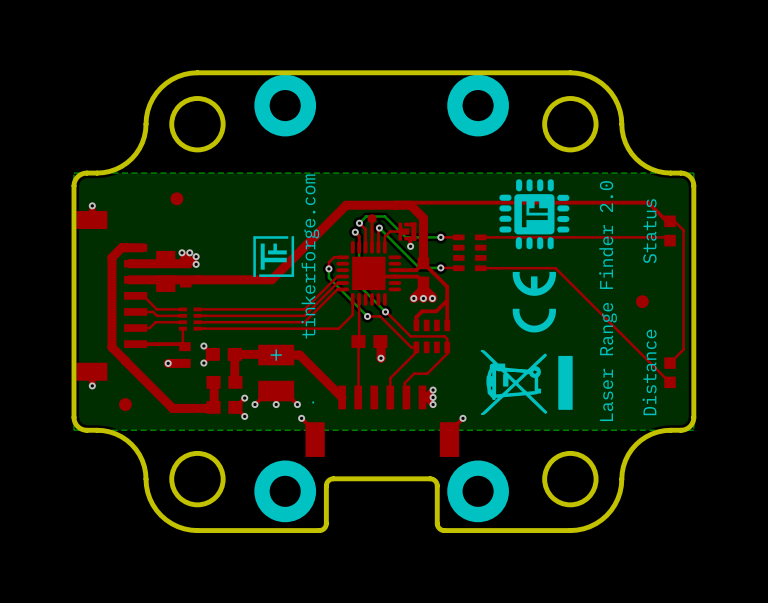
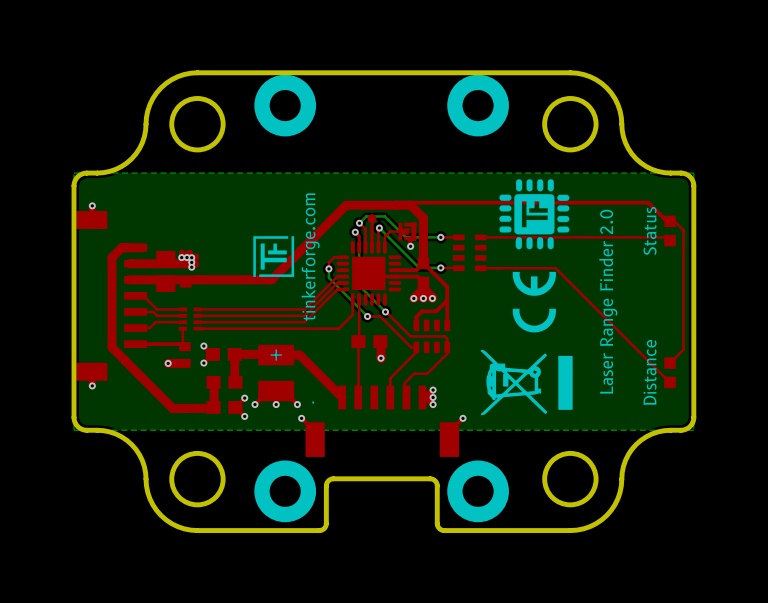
part: (176, 198) -> none
via: (182, 252) -> none
via: (189, 252) -> none
via: (196, 256) -> none
via: none -> (181, 257)
via: none -> (186, 257)
via: none -> (191, 257)
via: none -> (191, 262)
via: (196, 264) -> none
via: none -> (191, 267)
part: (642, 301) -> none
part: (125, 404) -> none

